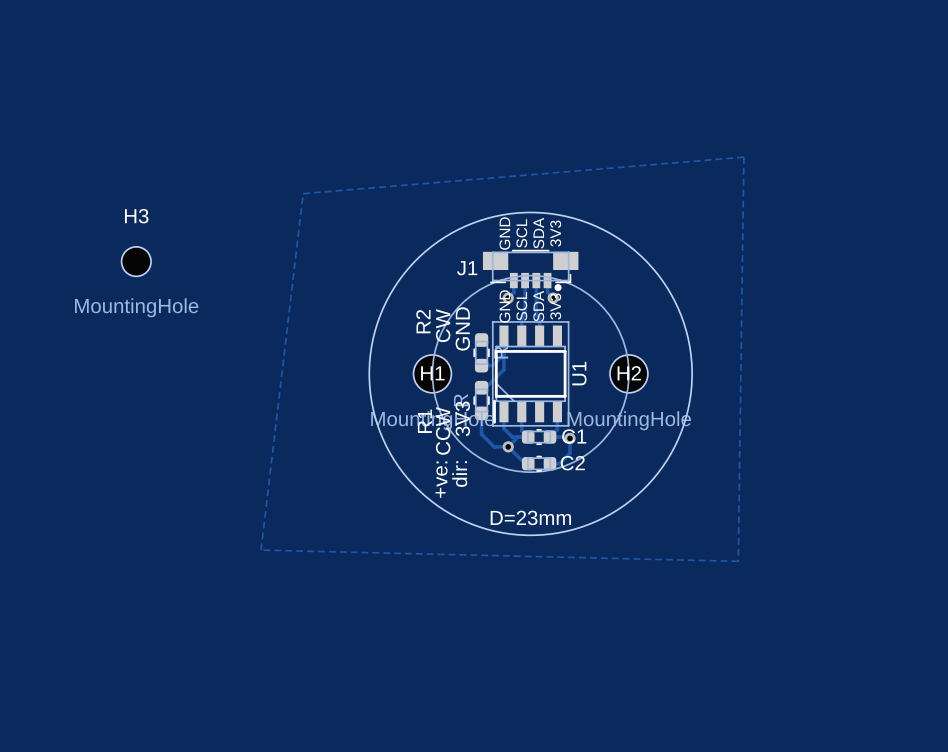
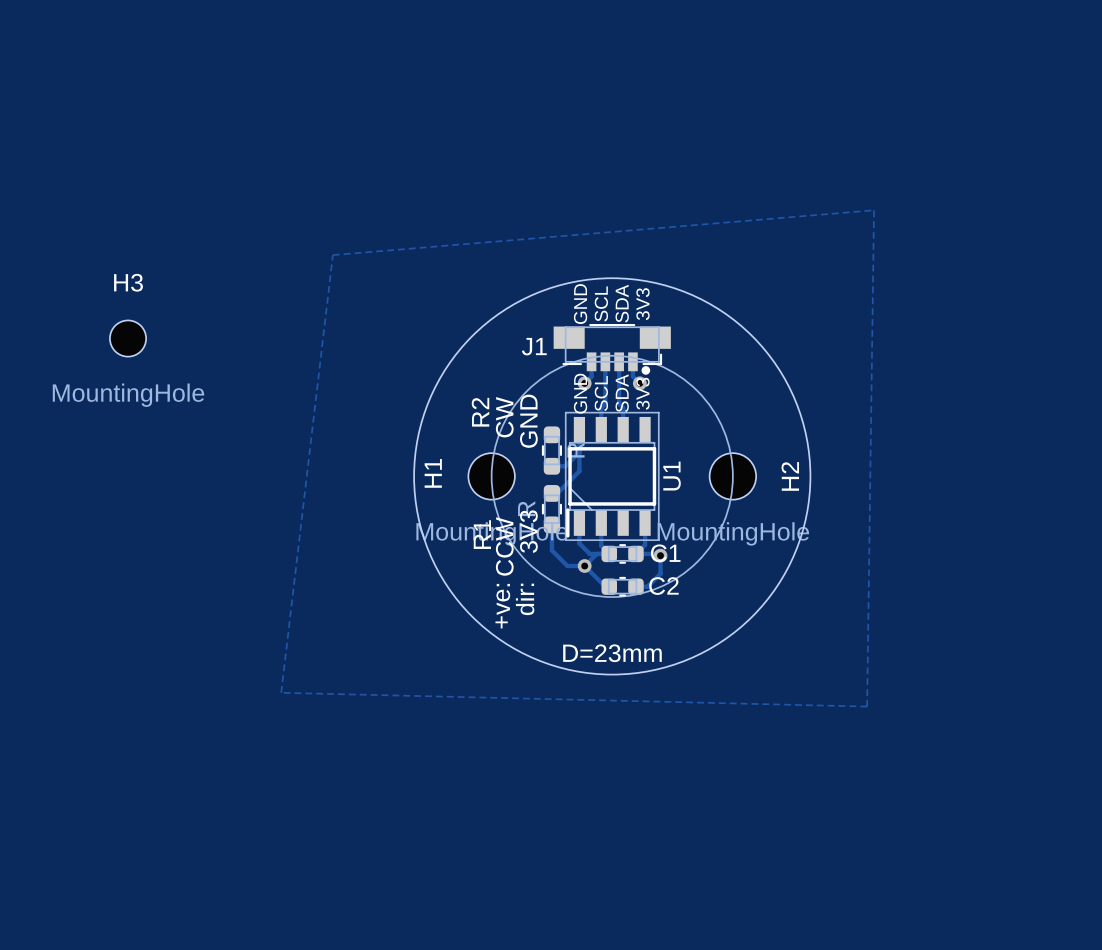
H1 name rotation: 0° (432, 373) -> 90° counterclockwise (433, 473)
H1 name position: H1 (432, 373) -> H1 (433, 473)
H2 name rotation: 0° (629, 373) -> 90° counterclockwise (790, 476)
H2 name position: H2 (629, 373) -> H2 (790, 476)

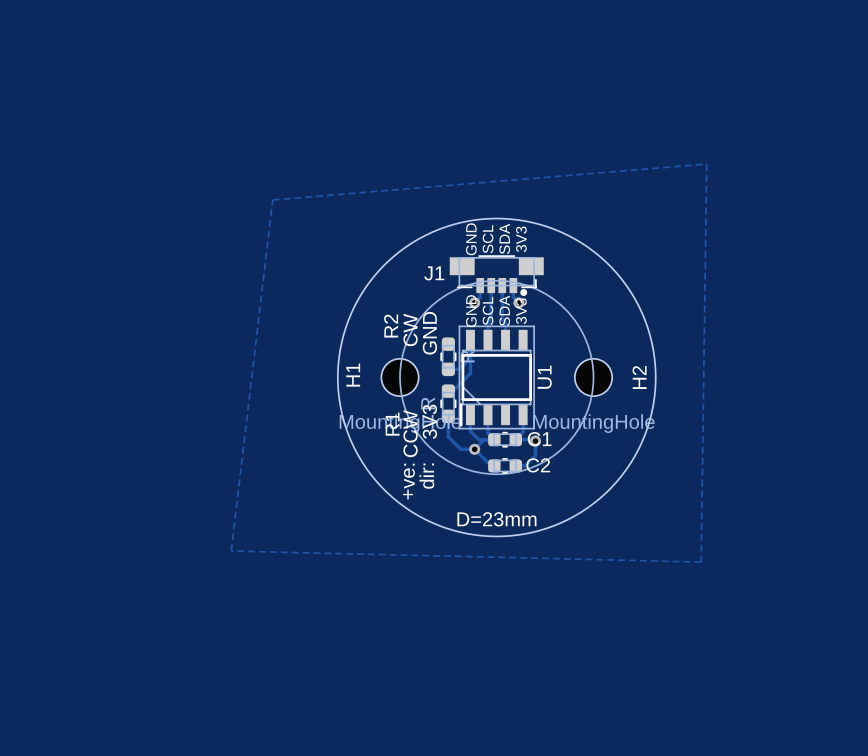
H3: MountingHole (128, 338) -> none

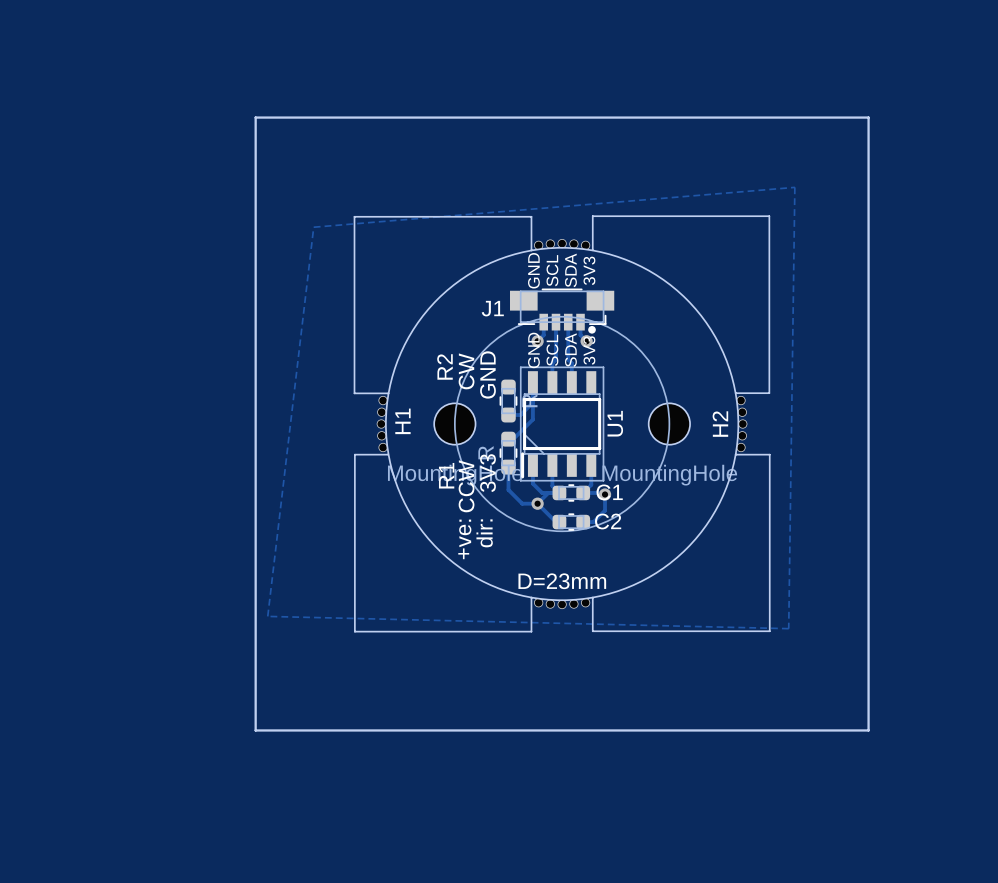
board edge: none -> (255, 117) (868, 117) (868, 730) (255, 730) (255, 117)
part: none -> (562, 244)
board edge: none -> (531, 250) (531, 216) (354, 216) (354, 393) (388, 393)
board edge: none -> (592, 250) (592, 216) (769, 216) (769, 393) (735, 393)
part: none -> (382, 424)
part: none -> (741, 424)
board edge: none -> (388, 454) (354, 454) (354, 631) (531, 631) (531, 597)
board edge: none -> (735, 454) (769, 454) (769, 631) (592, 631) (592, 597)
part: none -> (562, 603)

